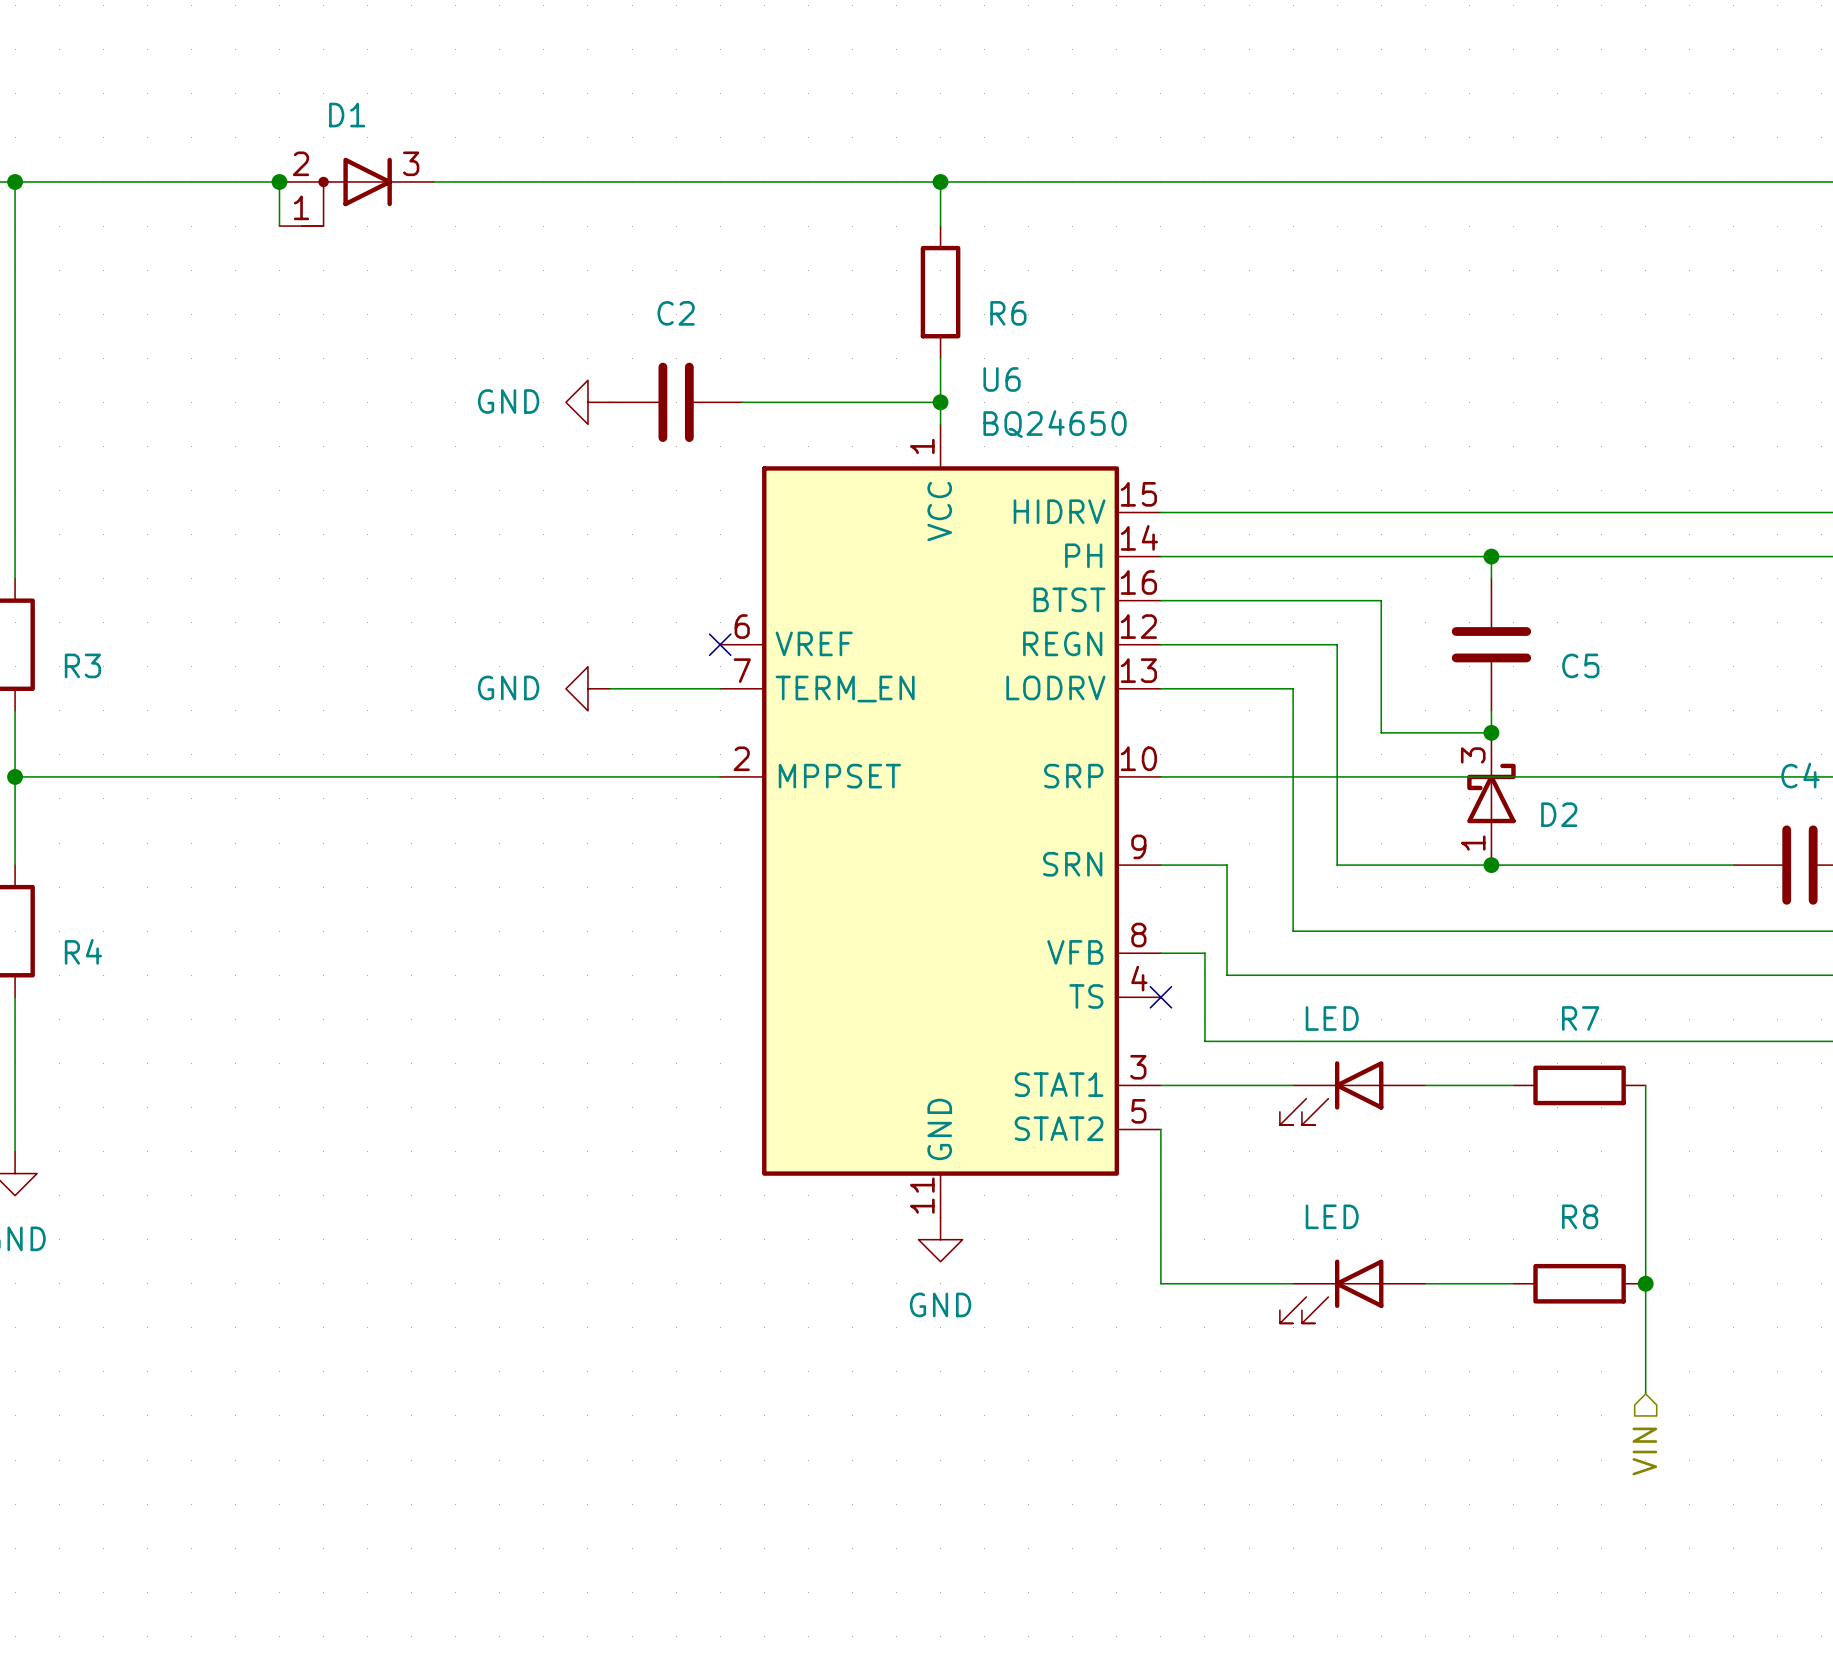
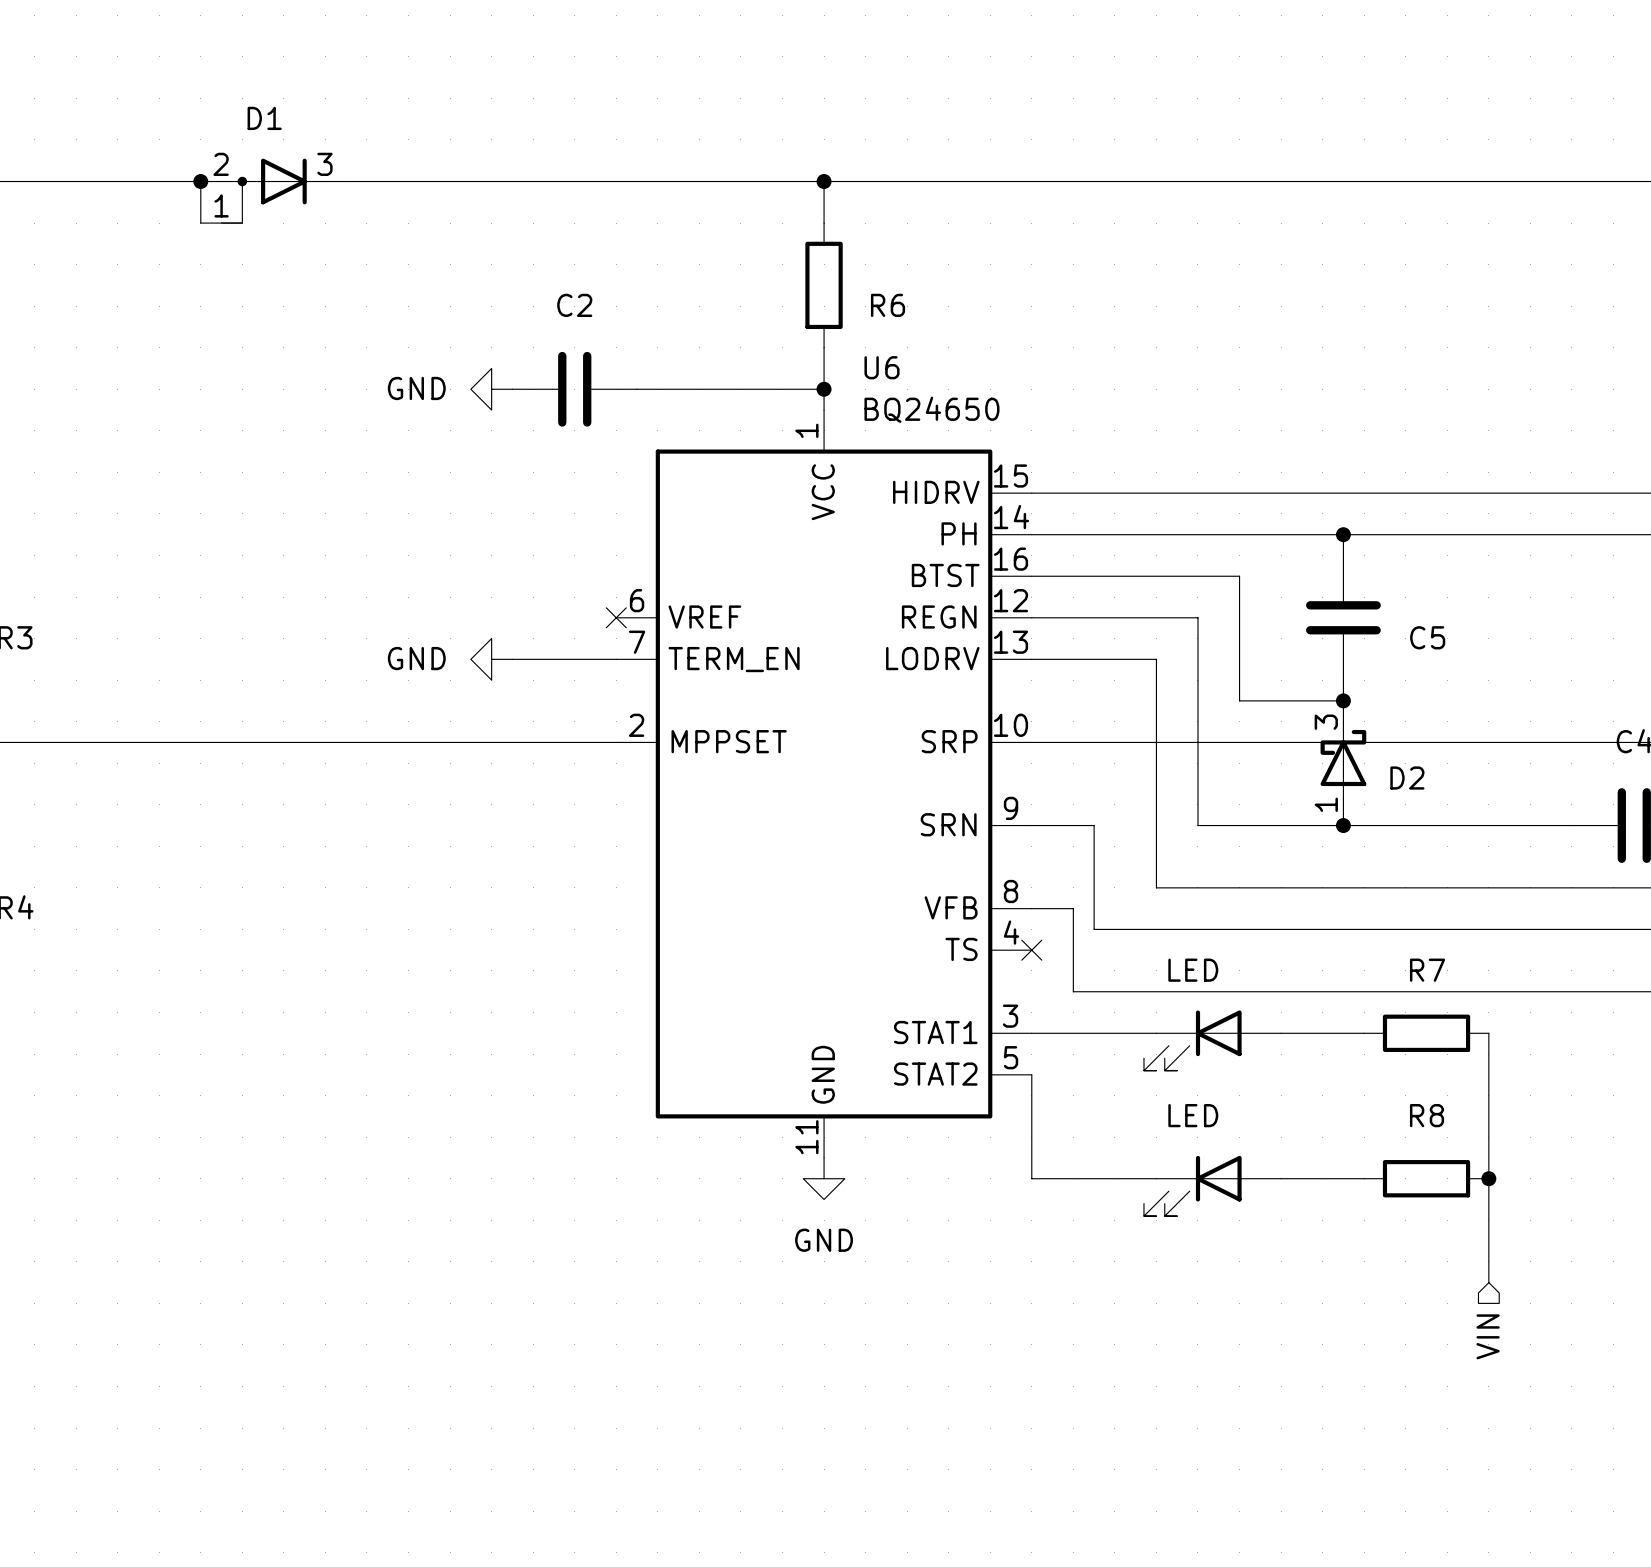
wire: (1160, 1239) (1160, 1283) (1293, 1283) -> (1031, 1178) (1156, 1178)
wire: (1425, 1283) (1513, 1283) -> (1281, 1178) (1364, 1178)
part position: (1579, 1283) -> (1426, 1178)
junction position: (1645, 1283) -> (1488, 1178)
part position: (1352, 1291) -> (1212, 1185)
wire: (1645, 1349) (1645, 1393) -> none
hierarchical label position: VIN (1644, 1451) -> VIN (1488, 1336)

